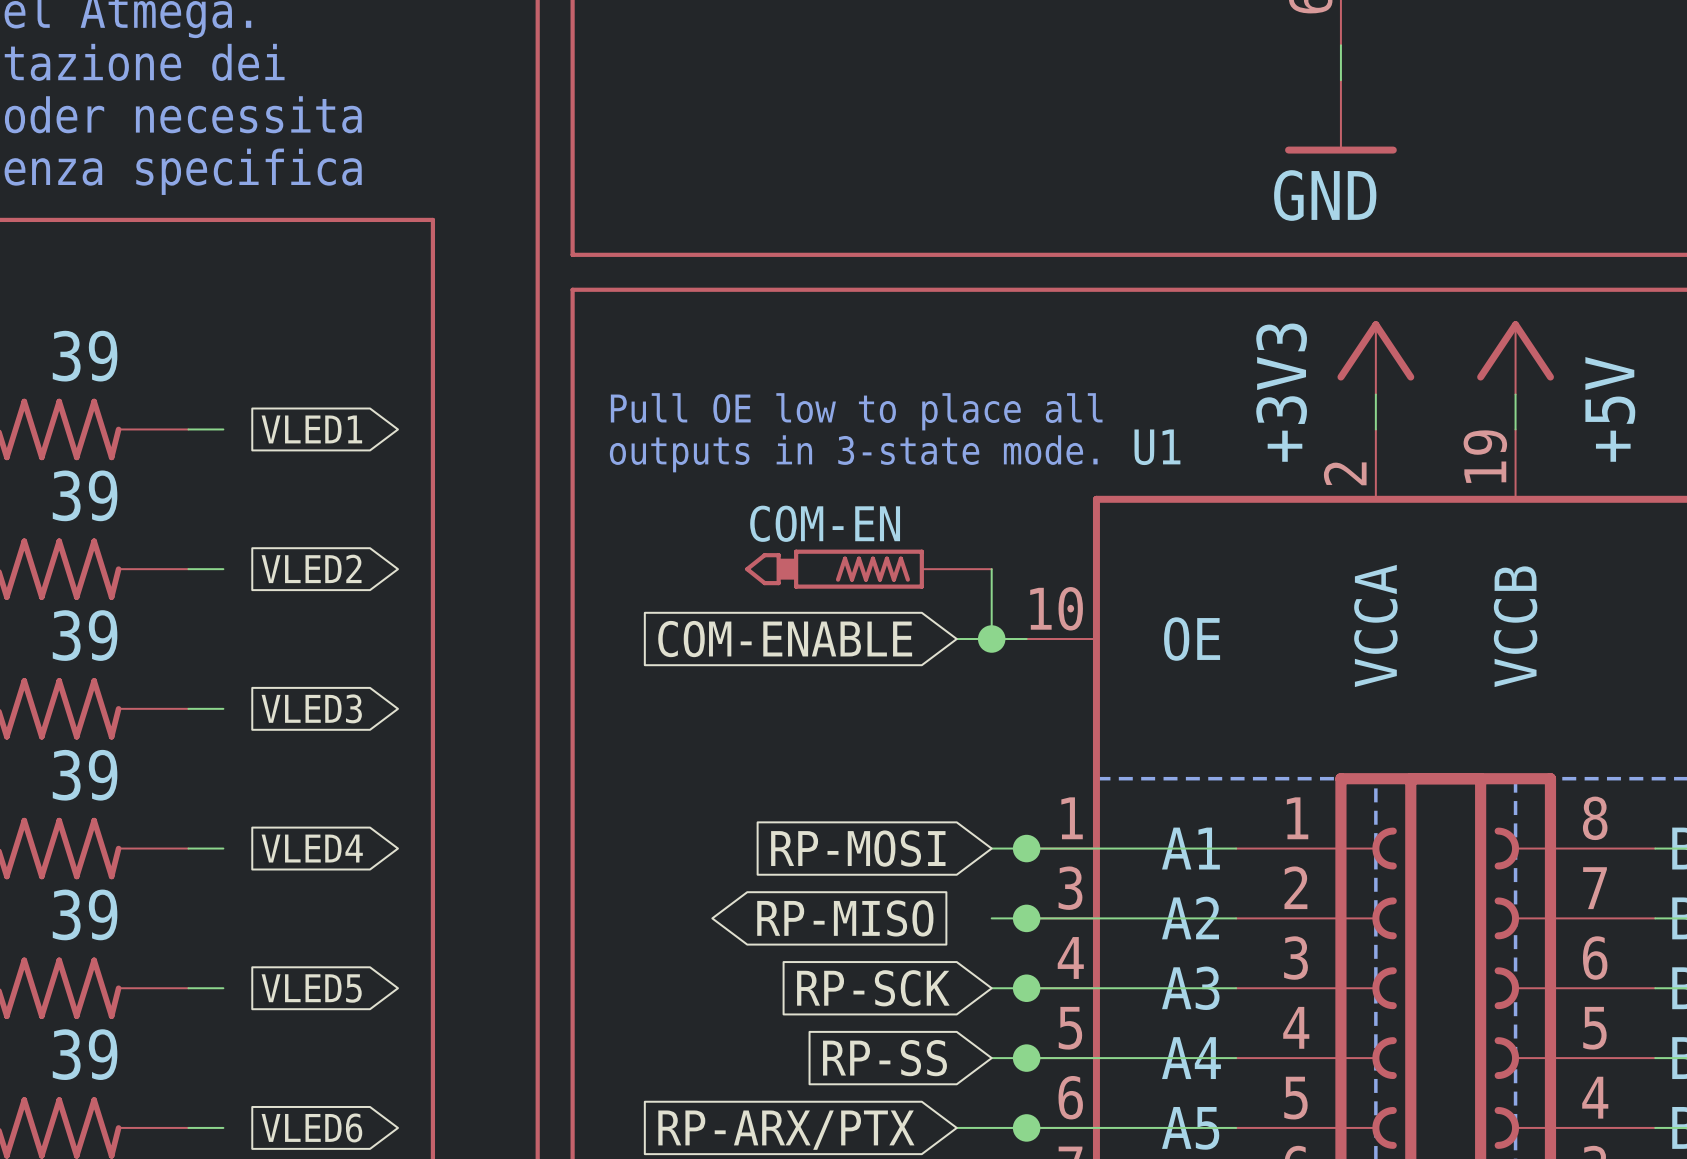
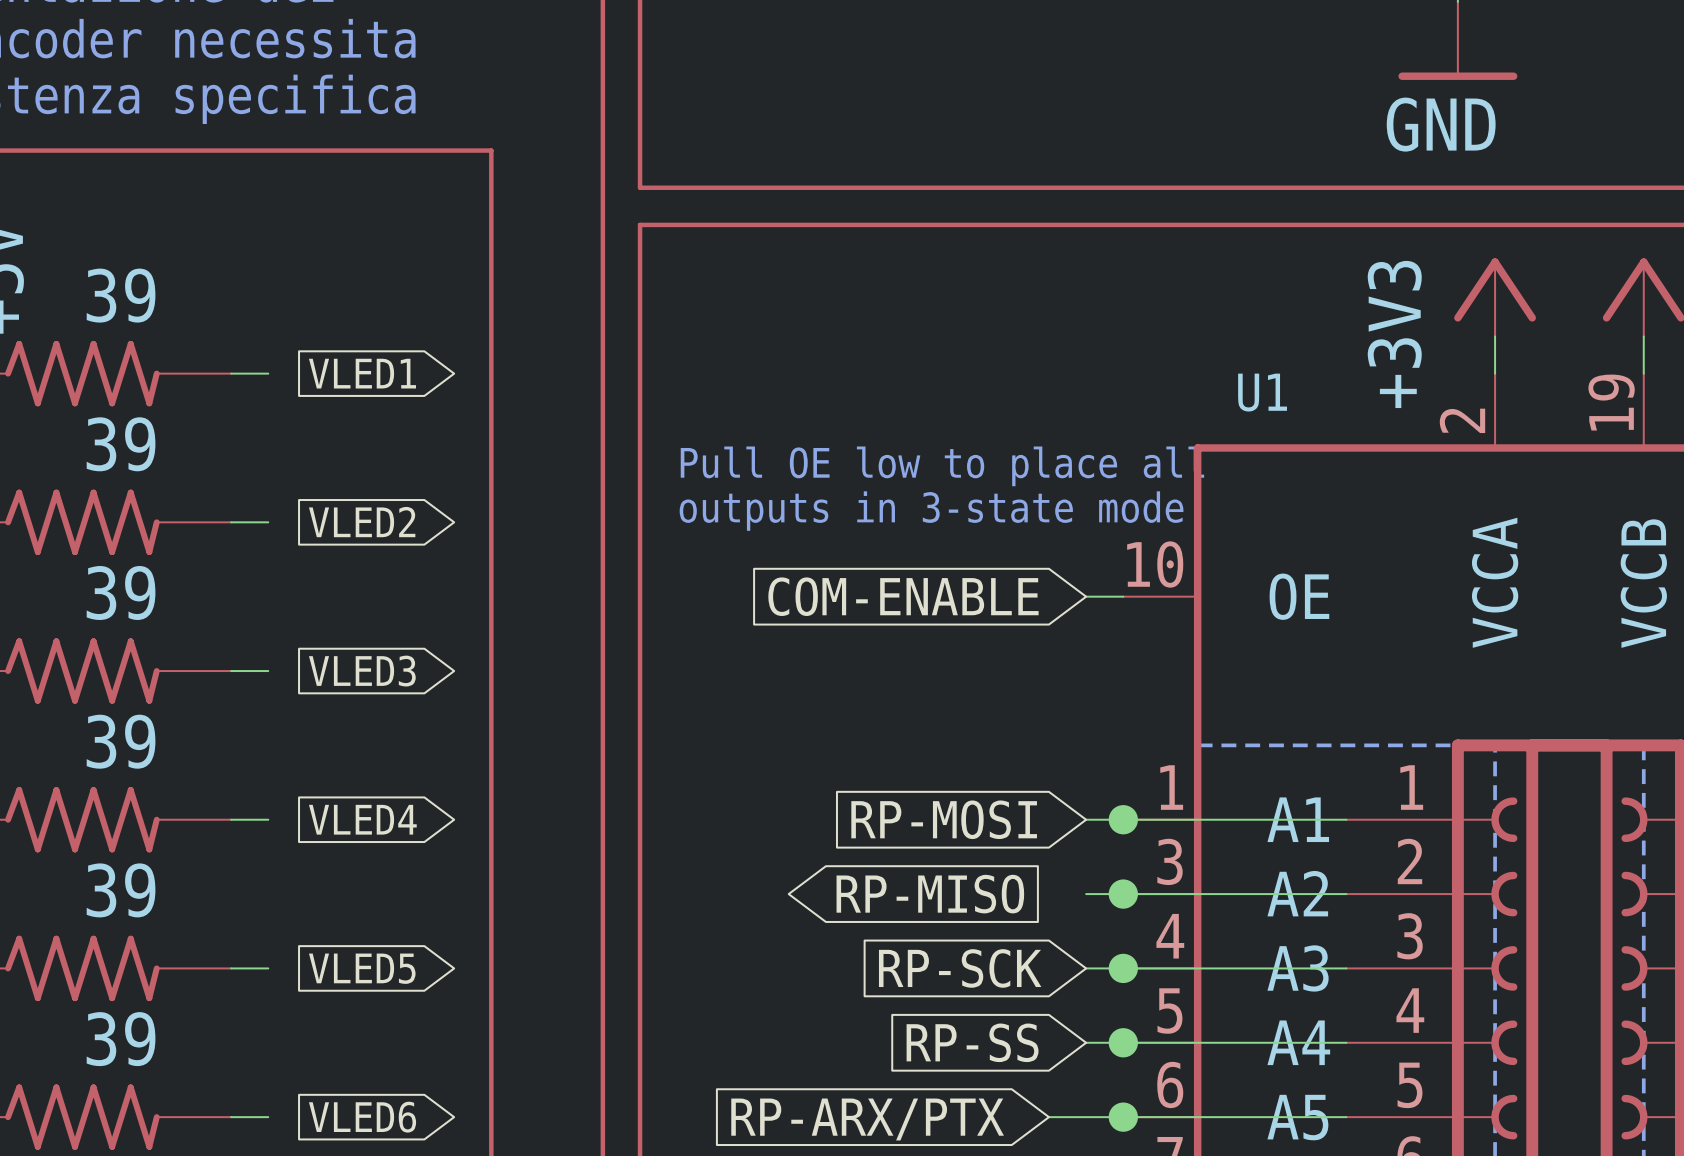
text position: Pull OE low to place all (856, 411) -> Pull OE low to place all (942, 466)
text position: outputs in 3-state mode. (853, 453) -> outputs in 3-state mode. (939, 511)
COM-EN: (868, 569) -> none
wire: (991, 569) (991, 639) (956, 639) -> none
global label position: COM-ENABLE (785, 639) -> COM-ENABLE (903, 596)
junction: (991, 639) -> none

